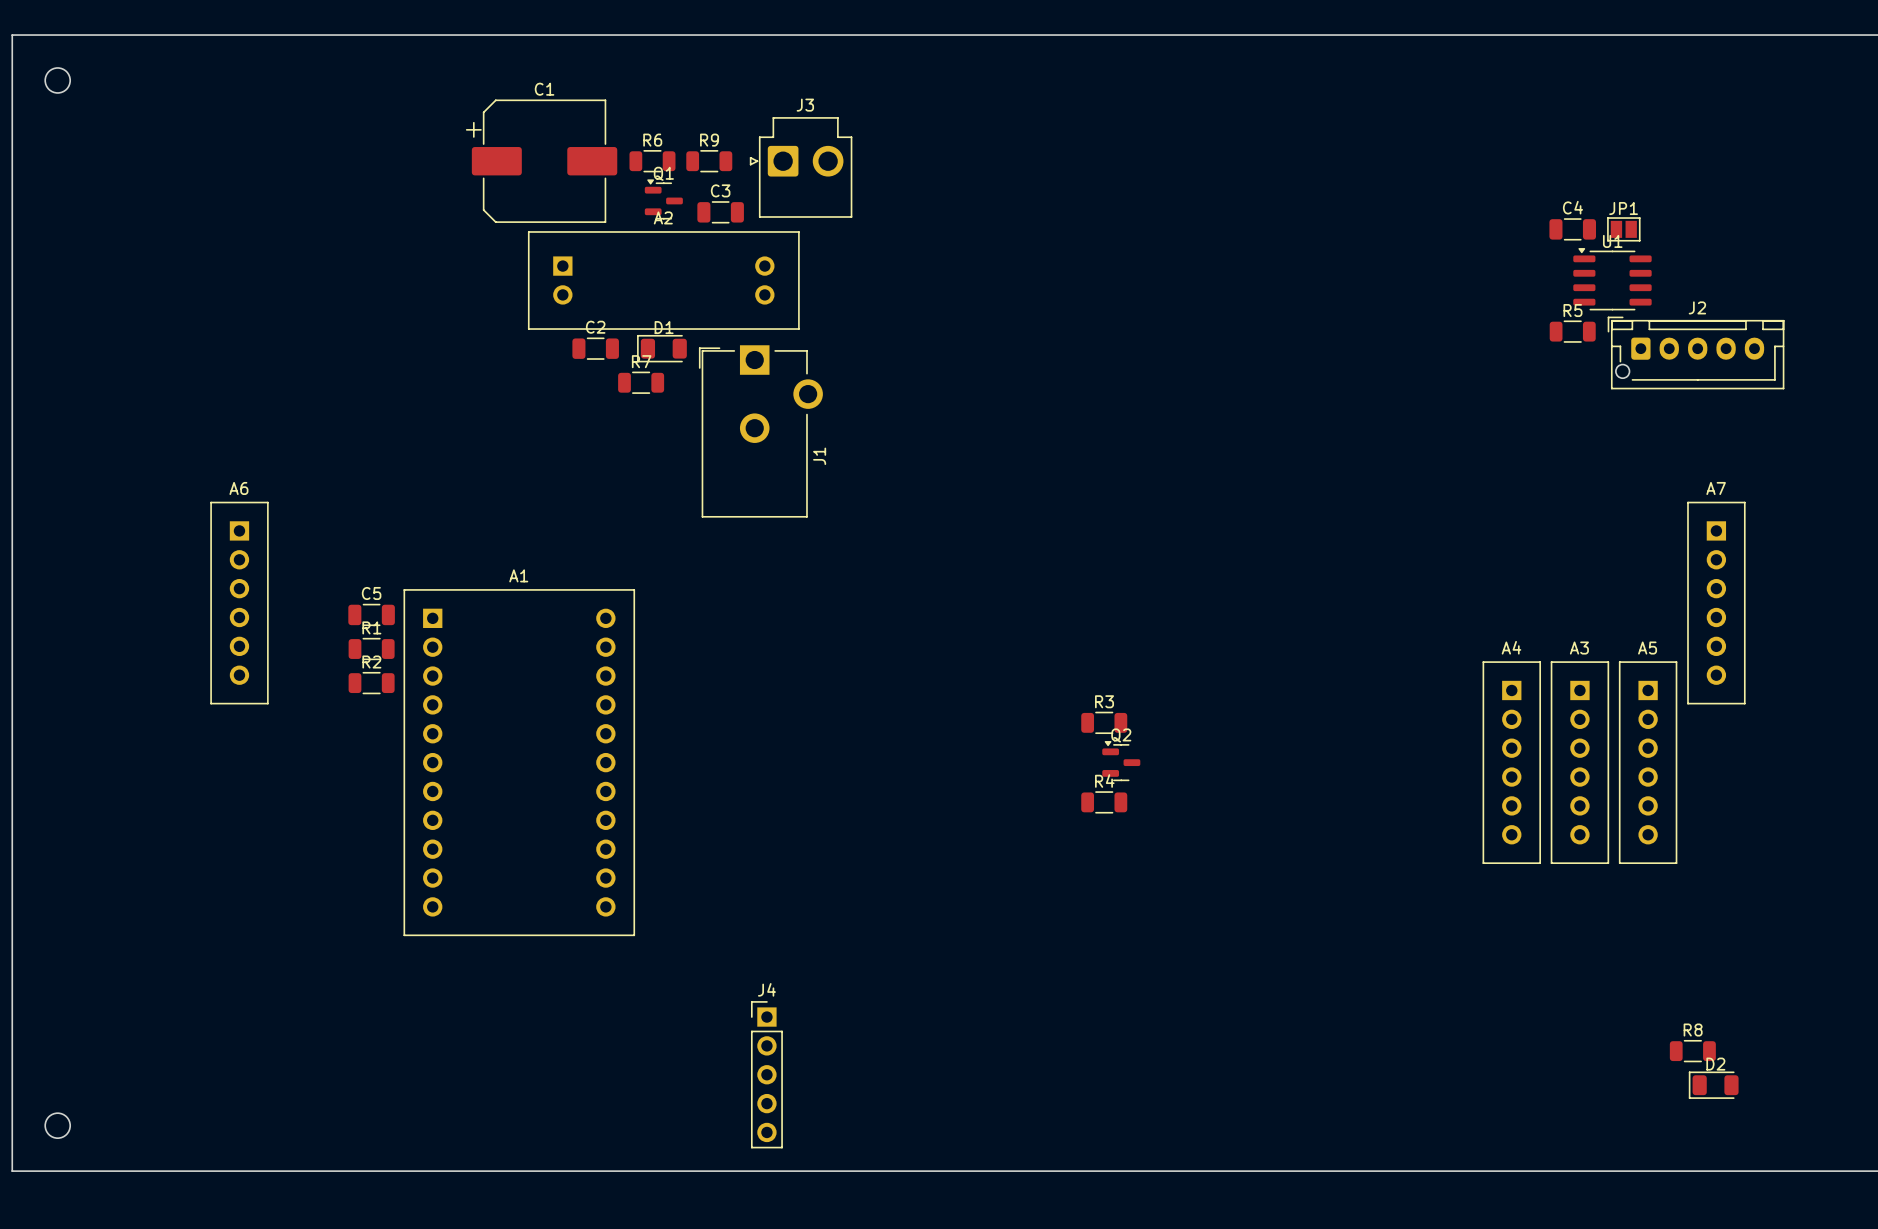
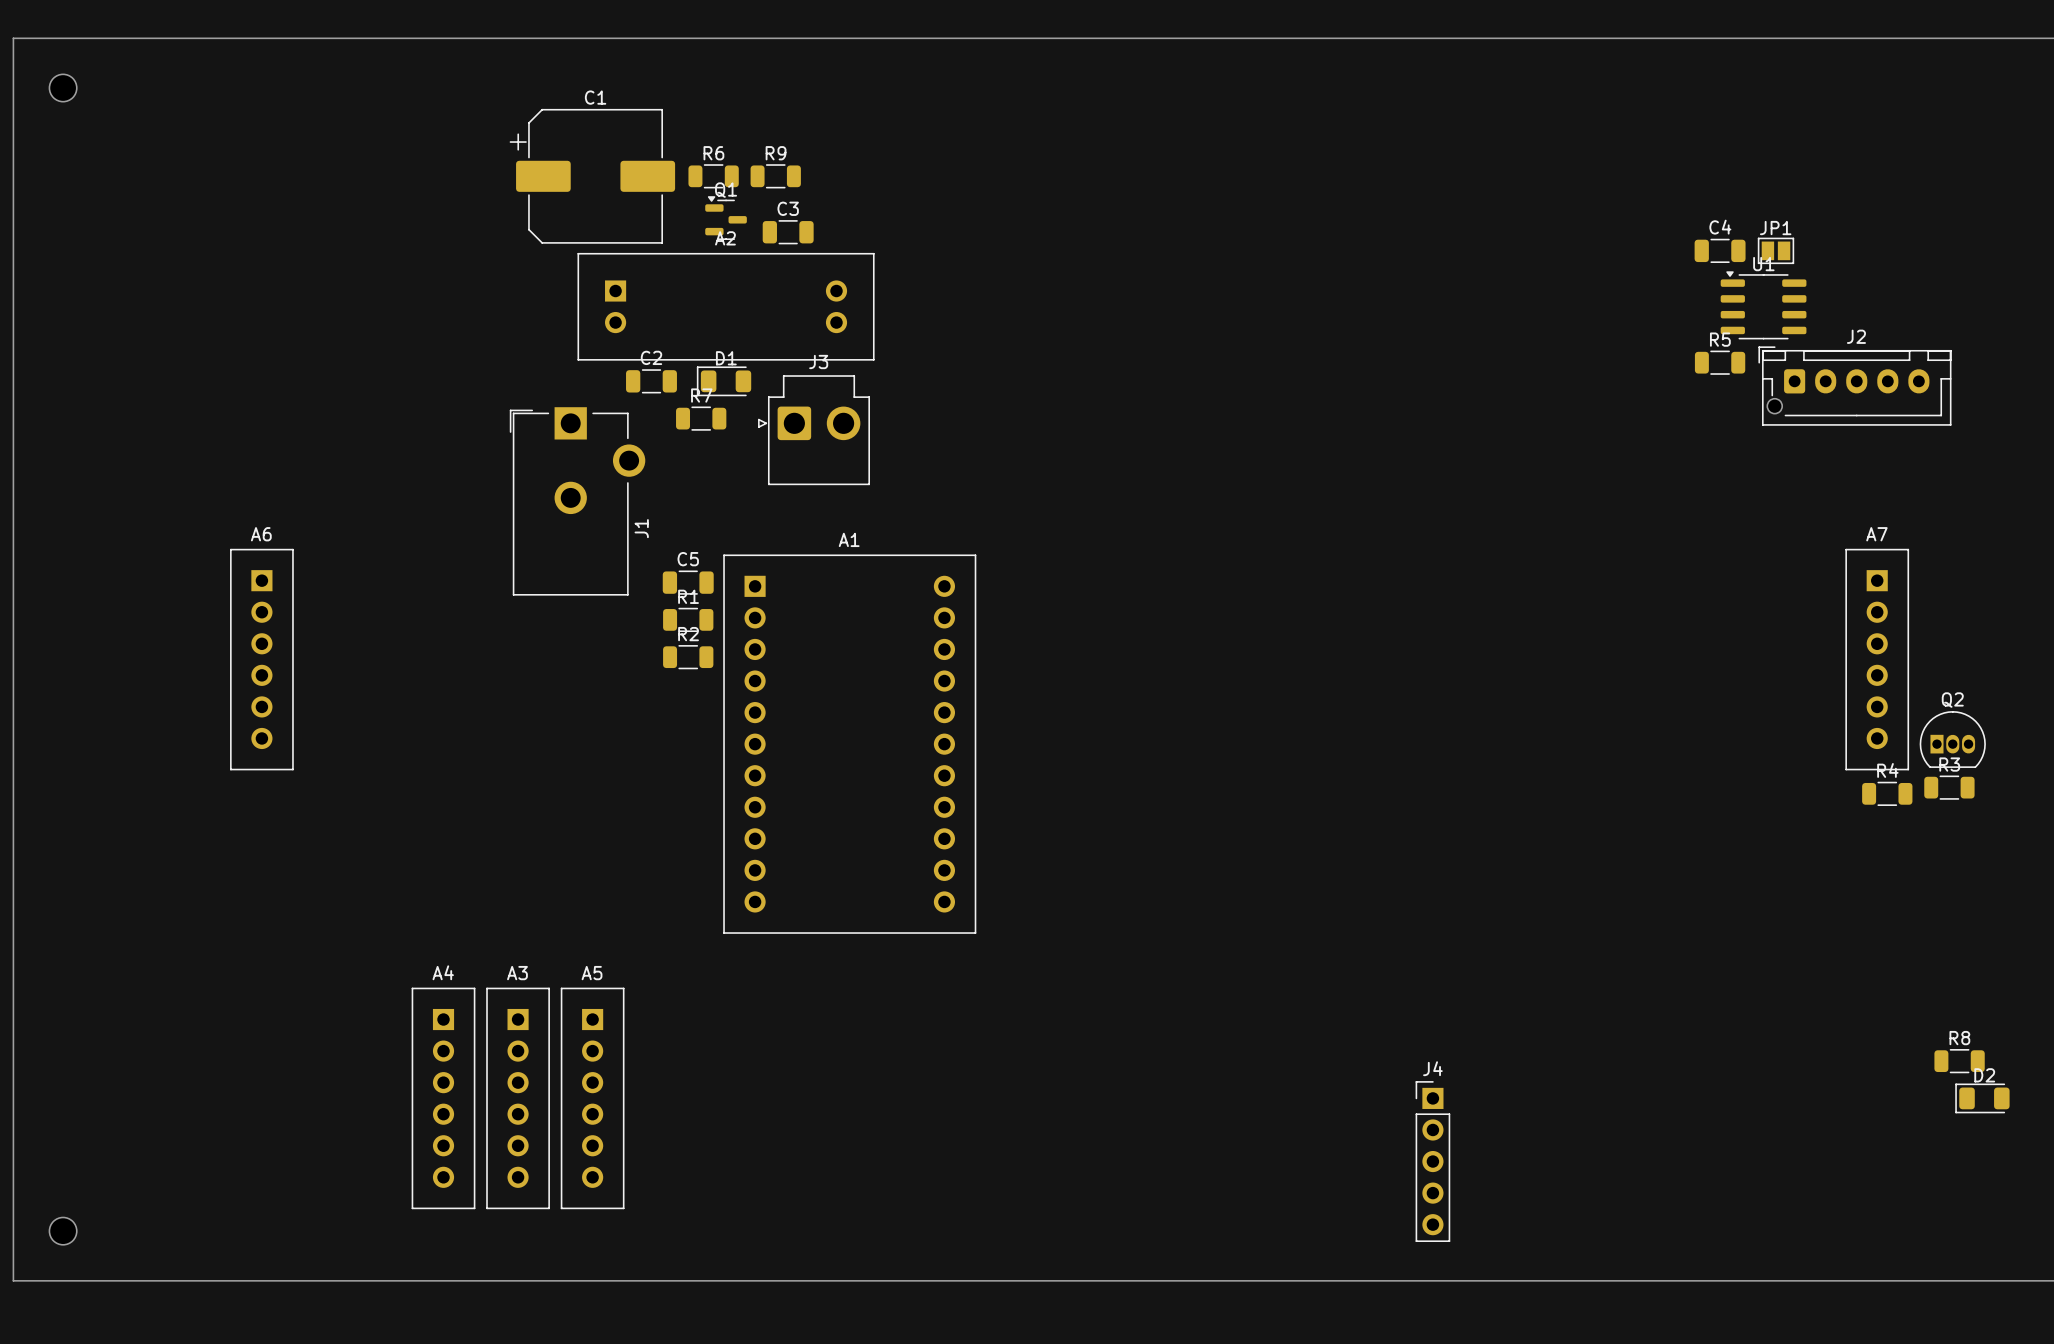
J3 position: (801, 167) -> (814, 430)
J1 position: (760, 431) -> (577, 501)
C5 position: (371, 614) -> (688, 582)
R1 position: (371, 649) -> (688, 619)
R2 position: (371, 683) -> (688, 657)
R3 position: (1104, 722) -> (1949, 787)
Q2 footprint: [1102, 741, 1141, 782] -> [1919, 711, 1986, 768]
A1 position: (519, 762) -> (849, 744)
A4 position: (1511, 762) -> (443, 1098)
A3 position: (1579, 762) -> (518, 1098)
A5 position: (1648, 762) -> (592, 1098)
R4 position: (1104, 802) -> (1887, 793)
R8 position: (1692, 1051) -> (1959, 1061)
J4 position: (766, 1074) -> (1432, 1161)
D2 position: (1713, 1085) -> (1982, 1098)

